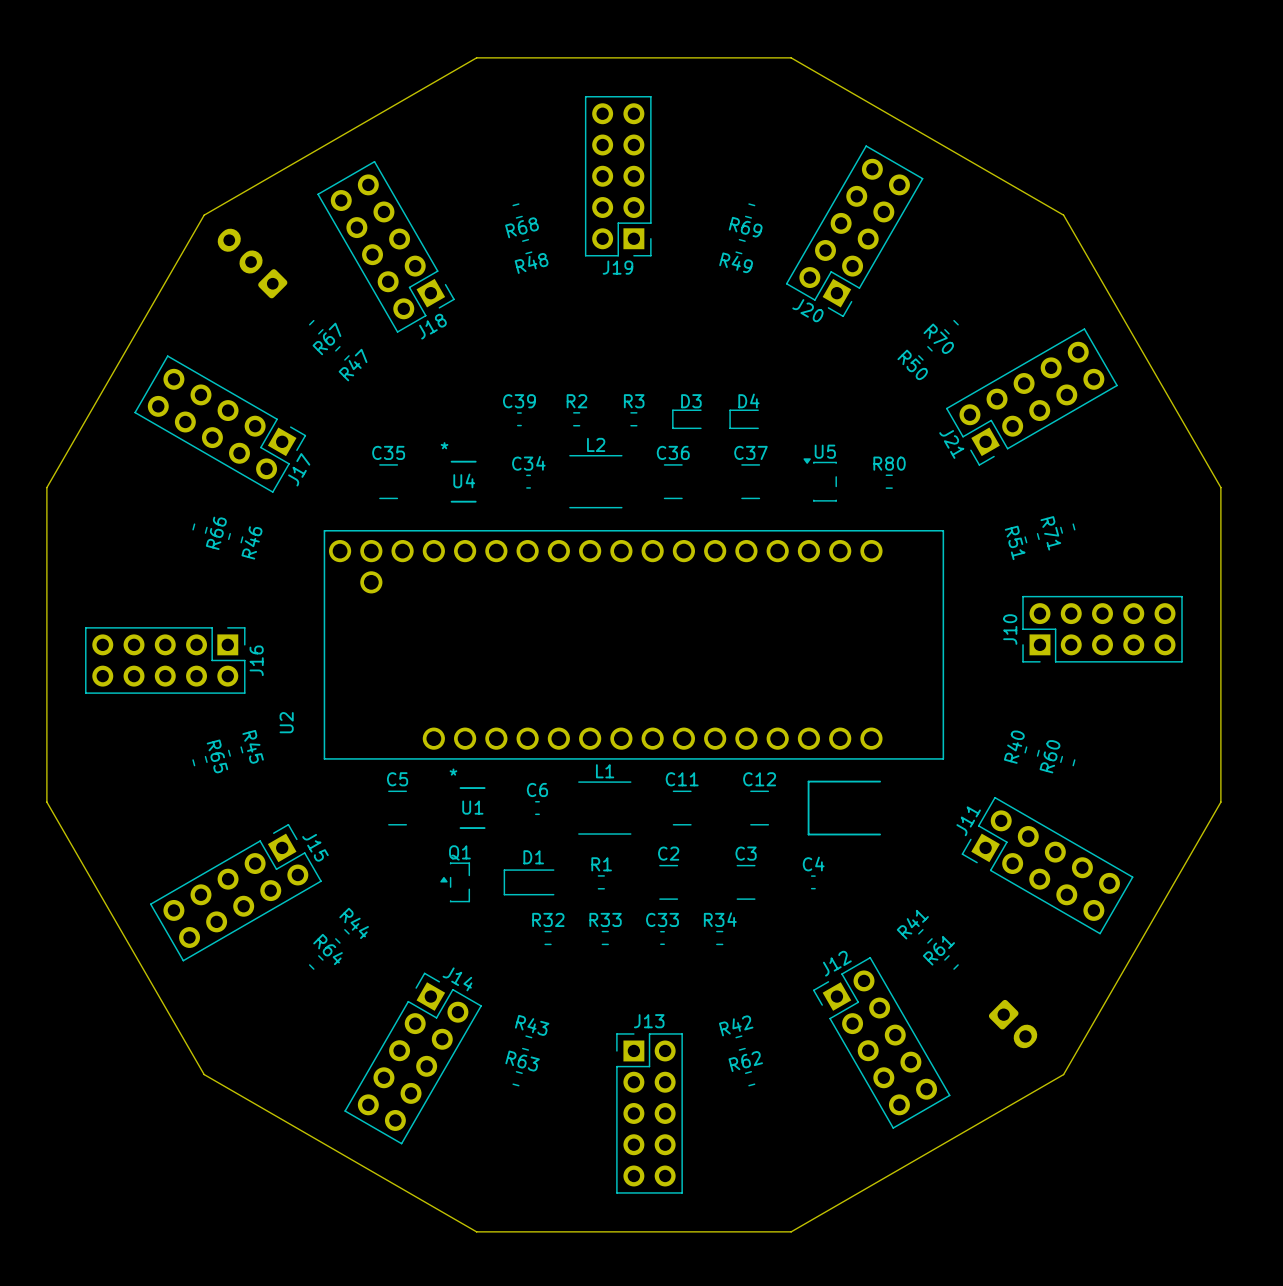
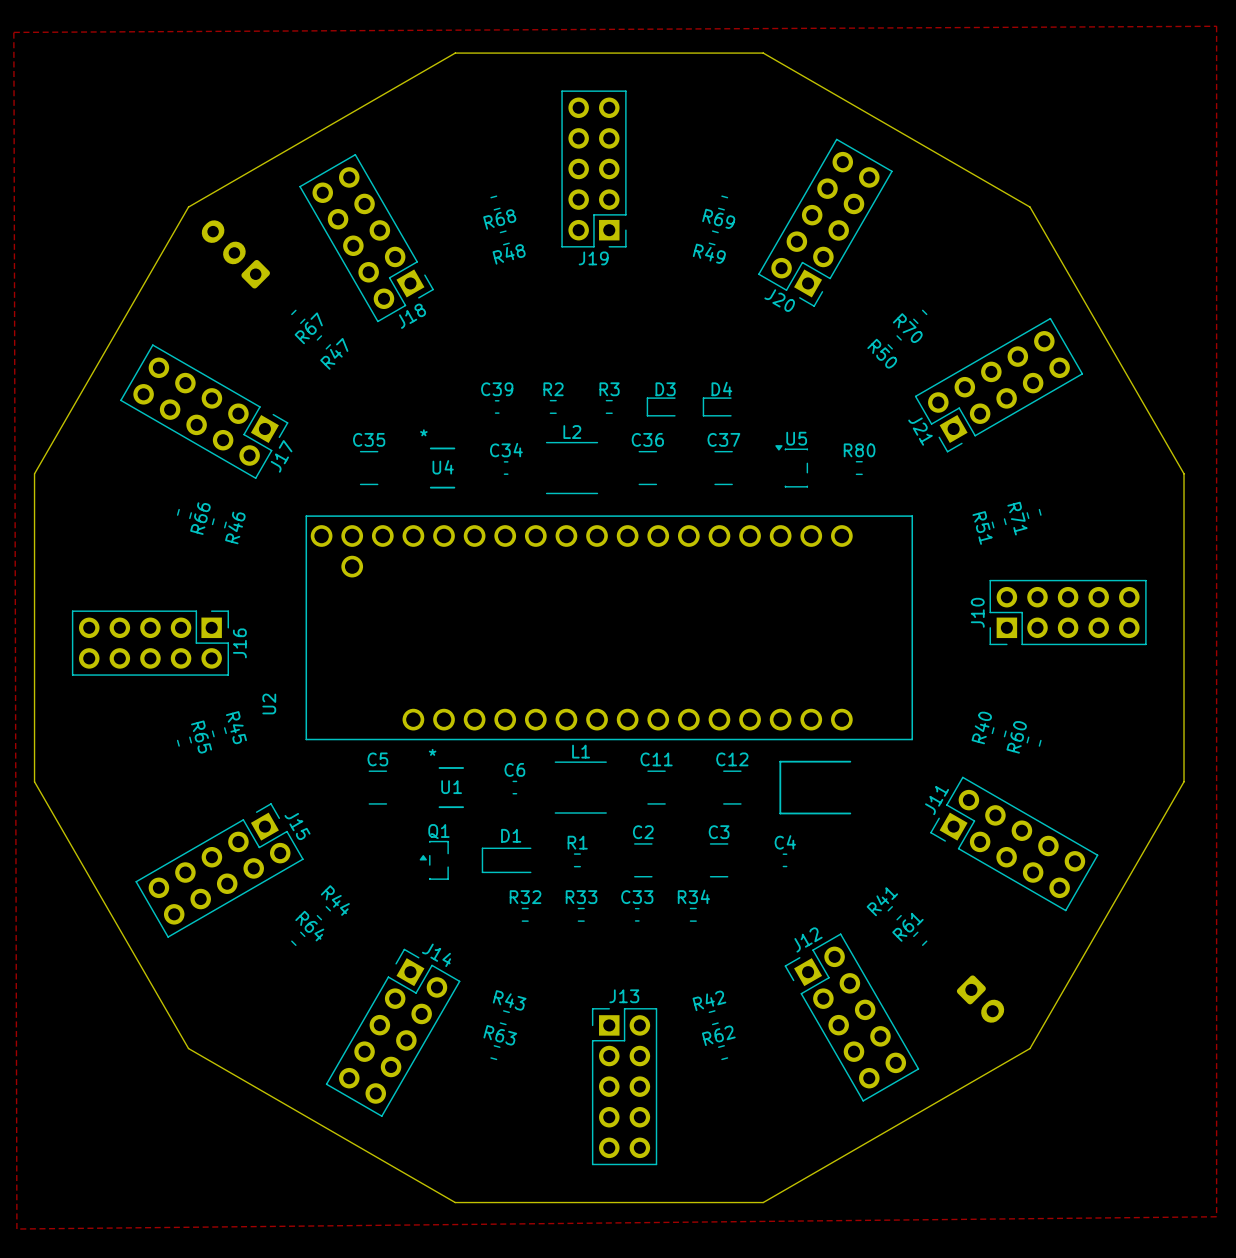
zone outline: none -> (1216, 26) (13, 32) (16, 1229) (1216, 1216) (1216, 26)

